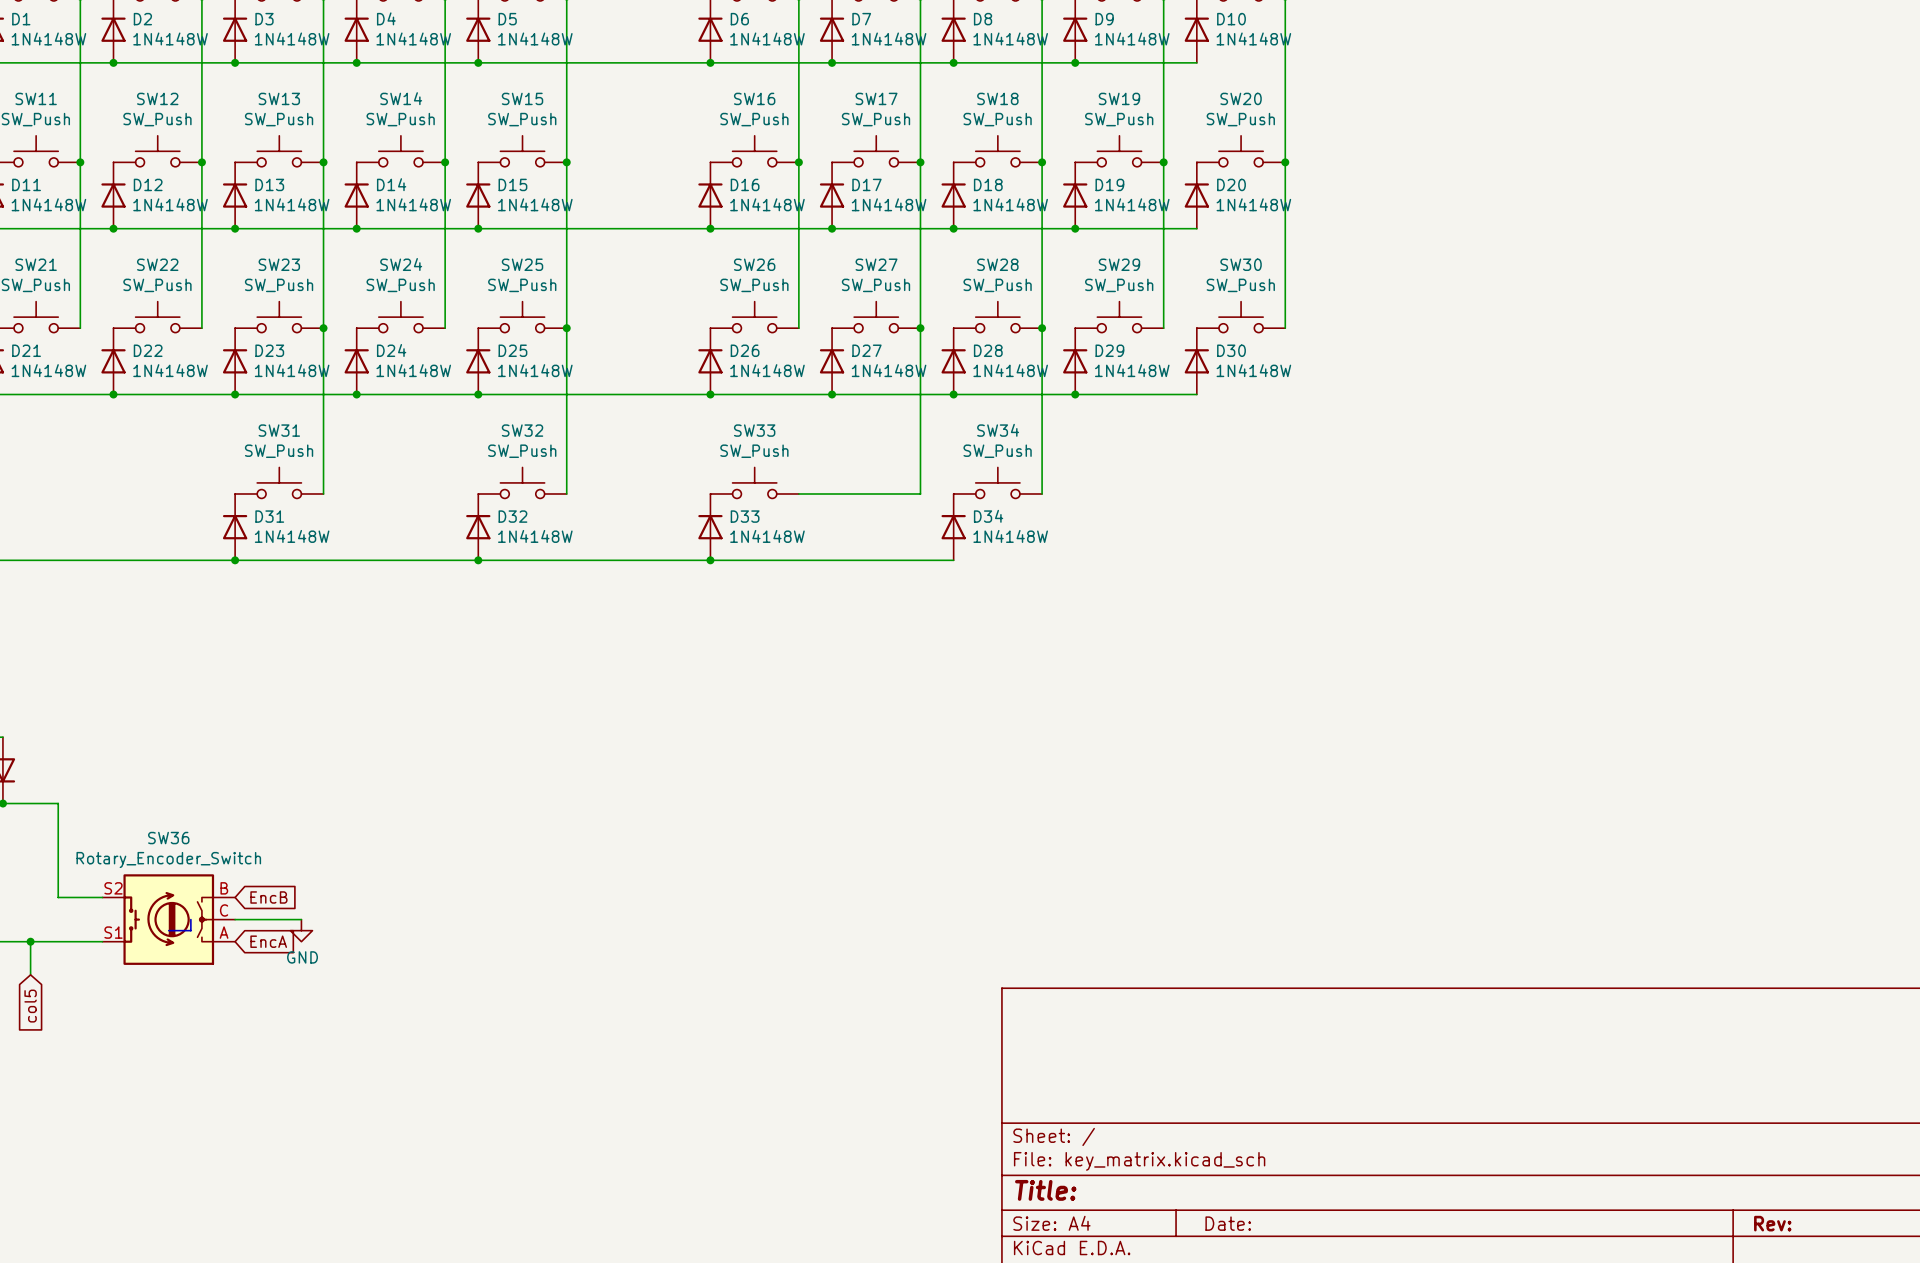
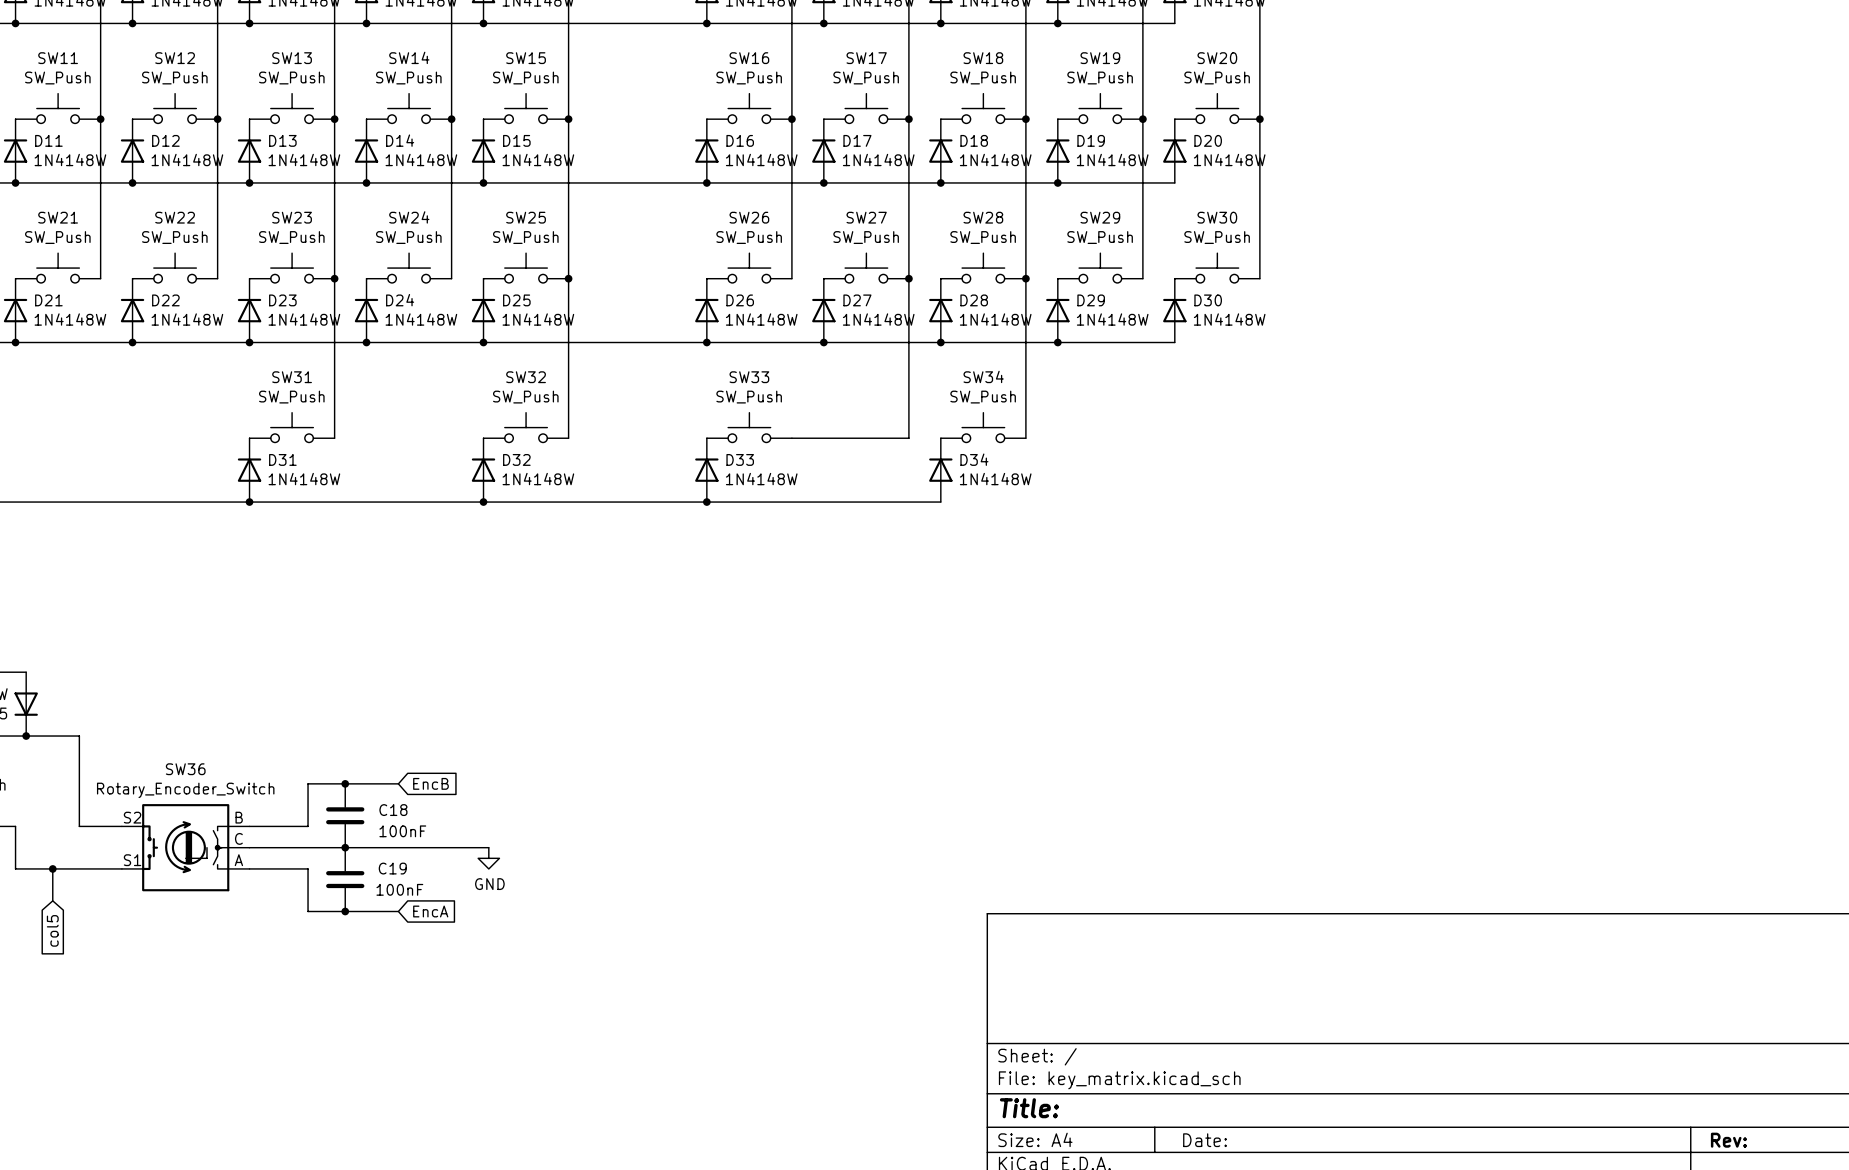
junction: none -> (345, 783)
wire: none -> (398, 783) (308, 783) (308, 826) (249, 826)
C18: none -> 100nF (345, 815)
global label position: EncB (268, 897) -> EncB (430, 783)
wire: none -> (313, 847) (488, 847)
junction: none -> (345, 847)
power symbol position: GND (301, 930) -> GND (488, 858)
wire: none -> (249, 868) (308, 868) (308, 911) (398, 911)
global label position: EncA (268, 941) -> EncA (430, 911)
C19: none -> 100nF (345, 879)
junction: none -> (345, 911)

